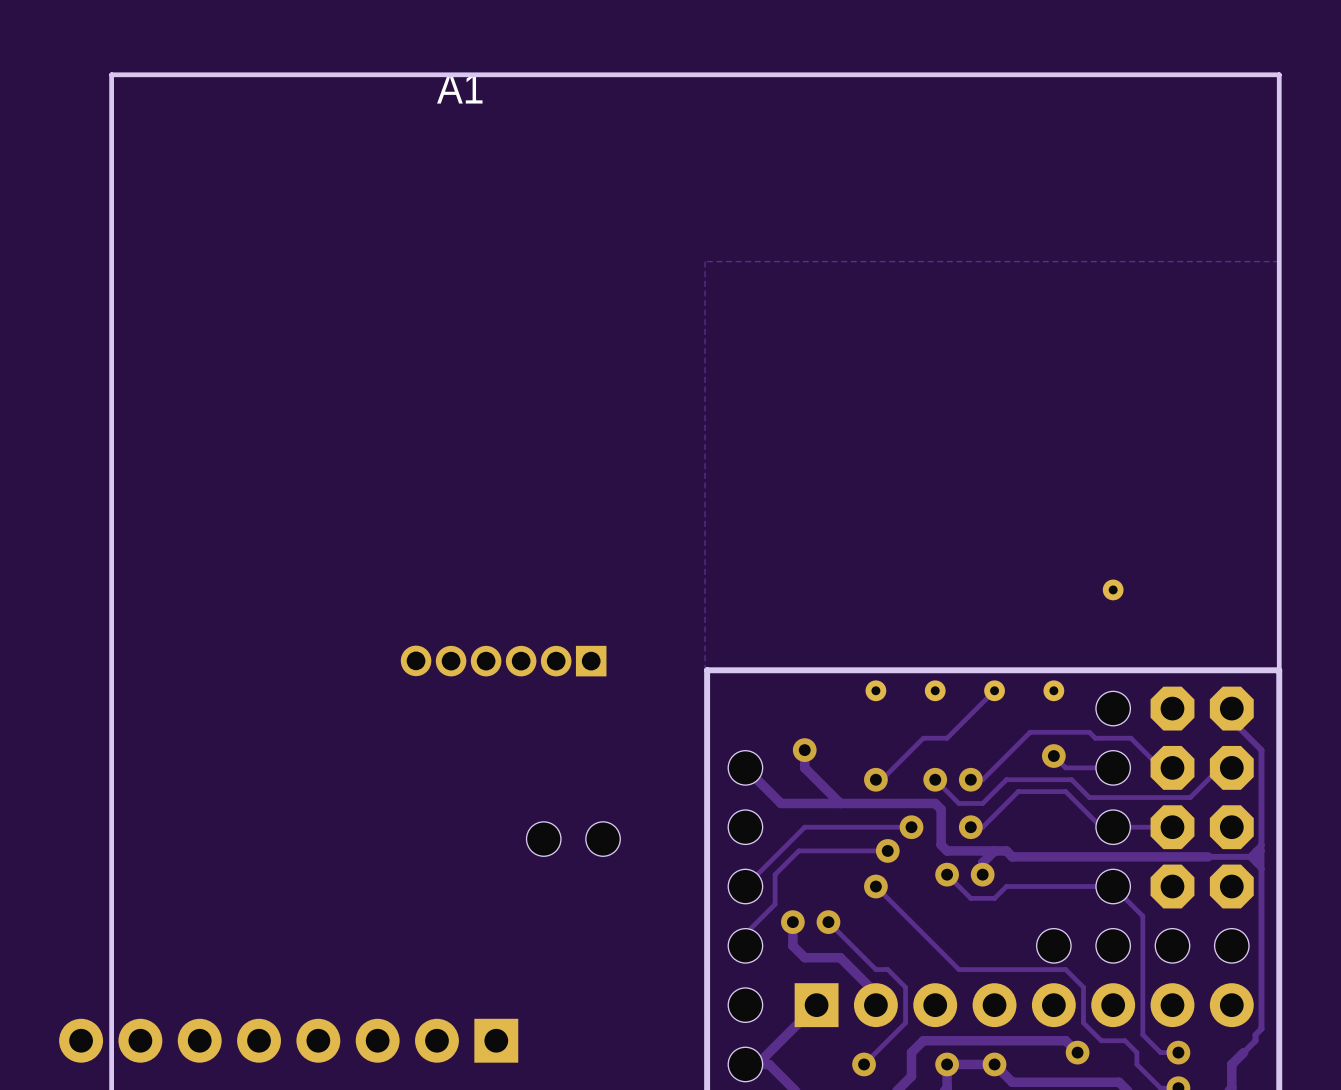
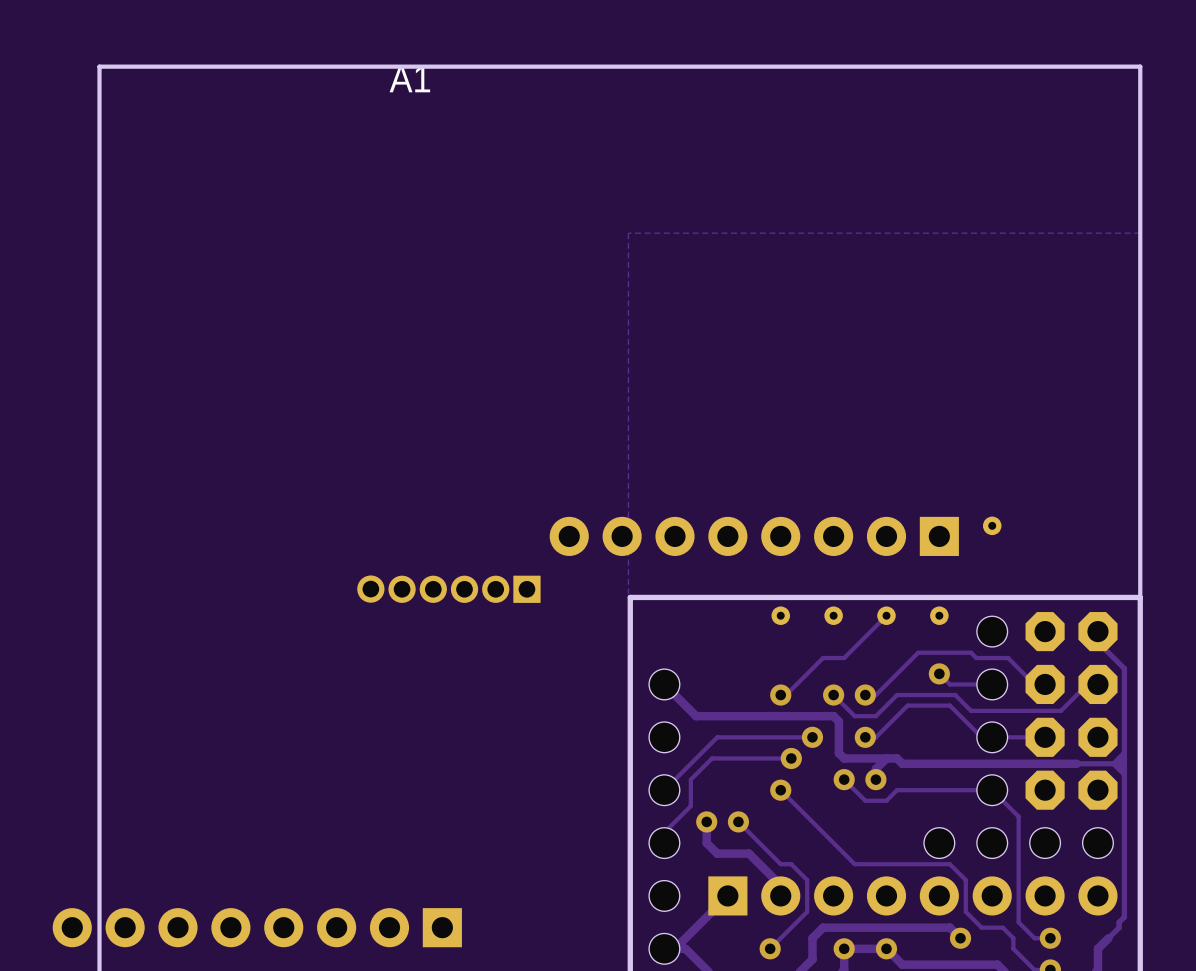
part: none -> (754, 536)
track: (804, 750) (804, 767) (840, 803) -> none
via: (804, 750) -> none
part: (543, 839) -> none
part: (603, 839) -> none

